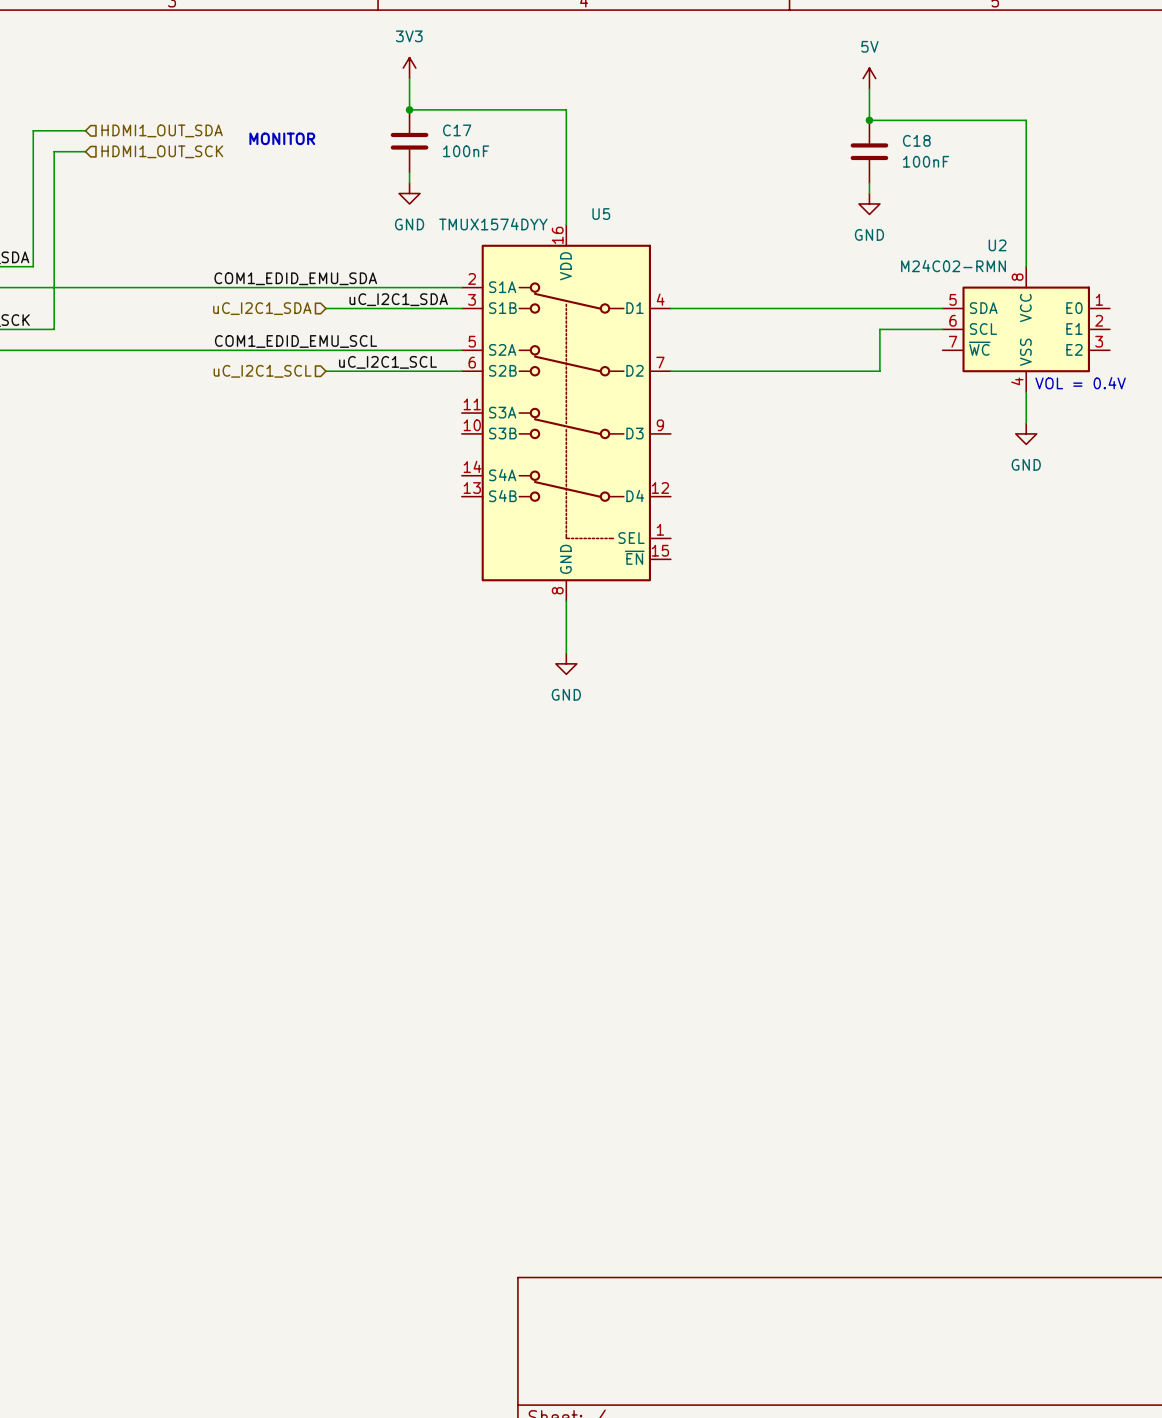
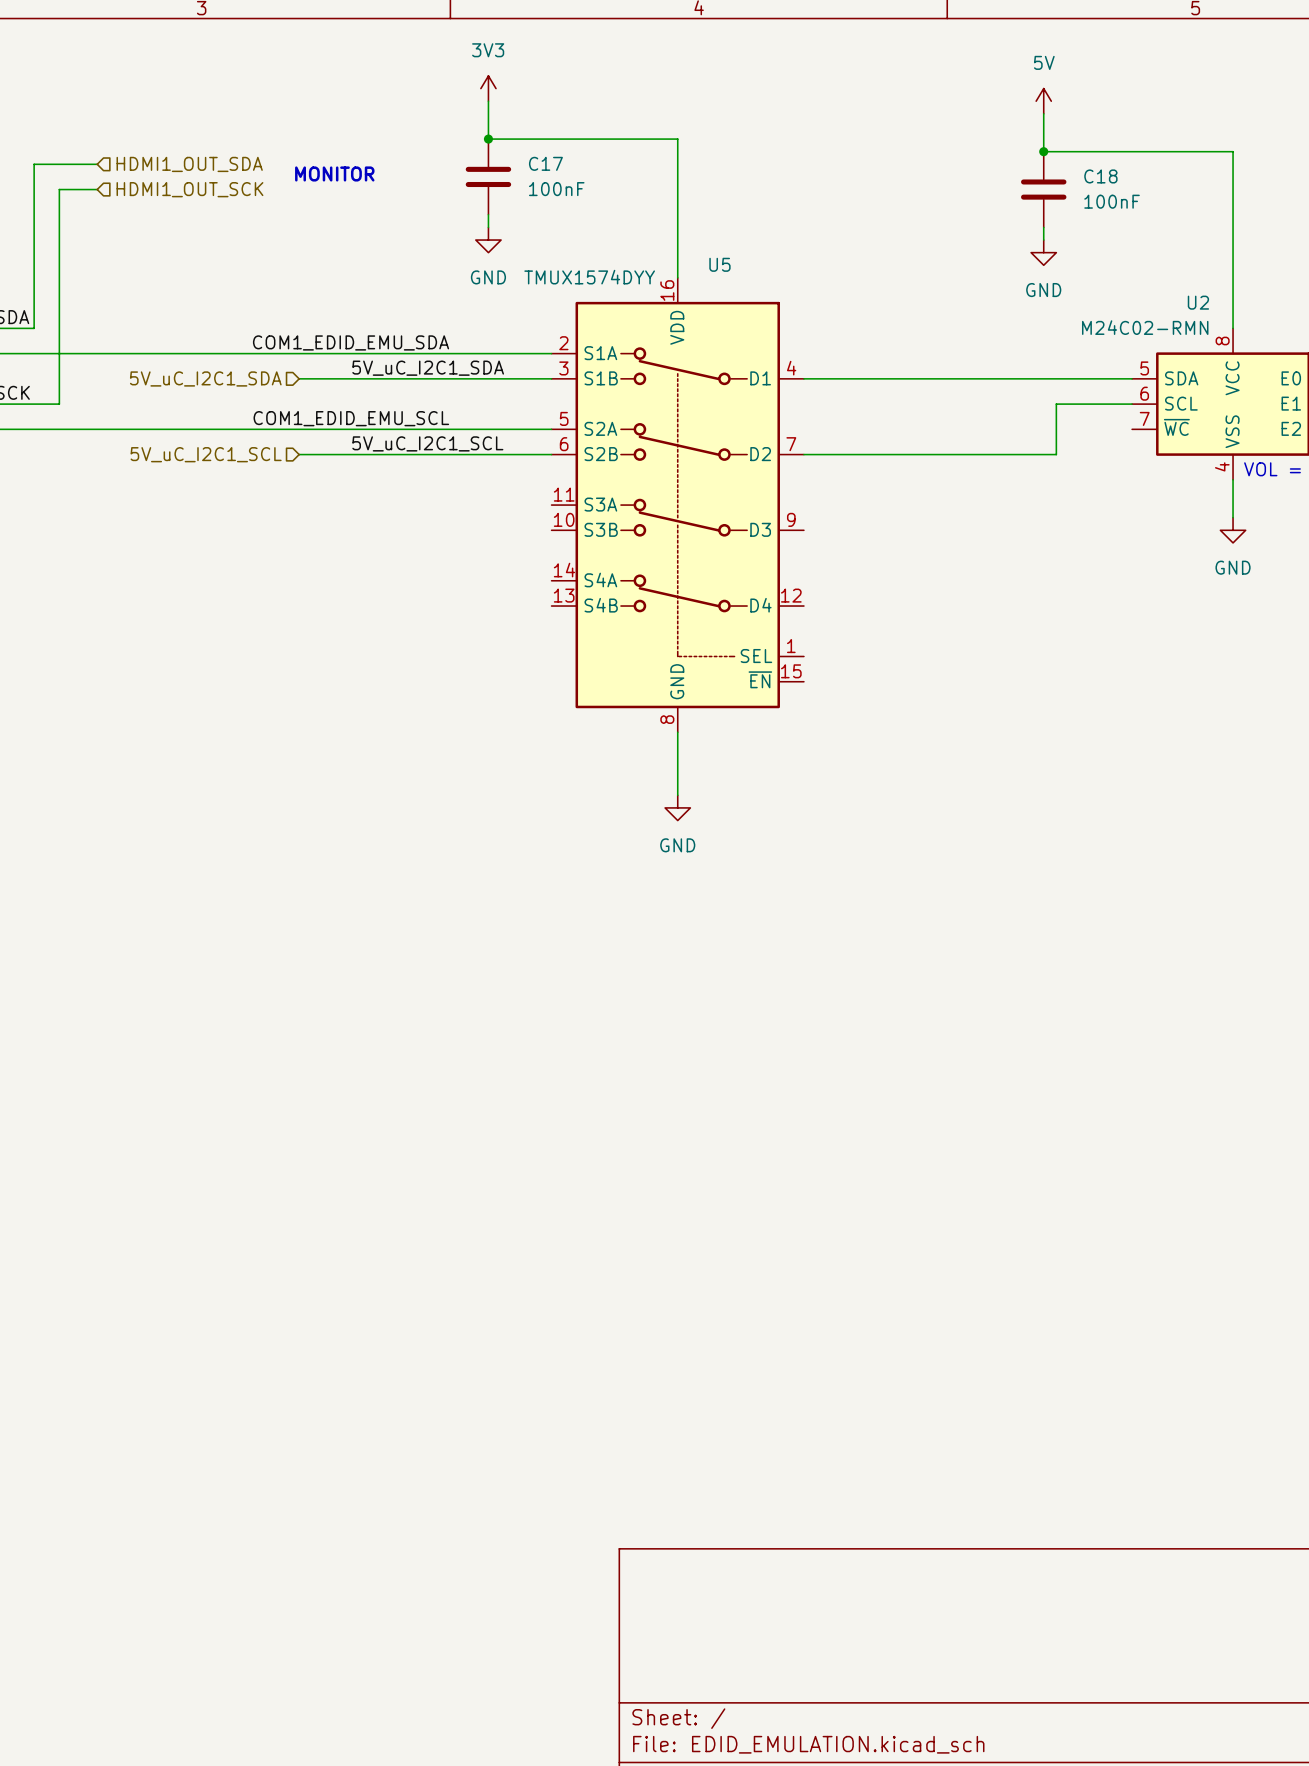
label: uC_I2C1_SDA (398, 299) -> 5V_uC_I2C1_SDA (428, 368)
wire: none -> (299, 378) (387, 378)
hierarchical label: uC_I2C1_SDA (262, 308) -> 5V_uC_I2C1_SDA (205, 378)
label: uC_I2C1_SCL (387, 362) -> 5V_uC_I2C1_SCL (427, 443)
wire: none -> (299, 454) (387, 454)
hierarchical label: uC_I2C1_SCL (262, 371) -> 5V_uC_I2C1_SCL (206, 454)

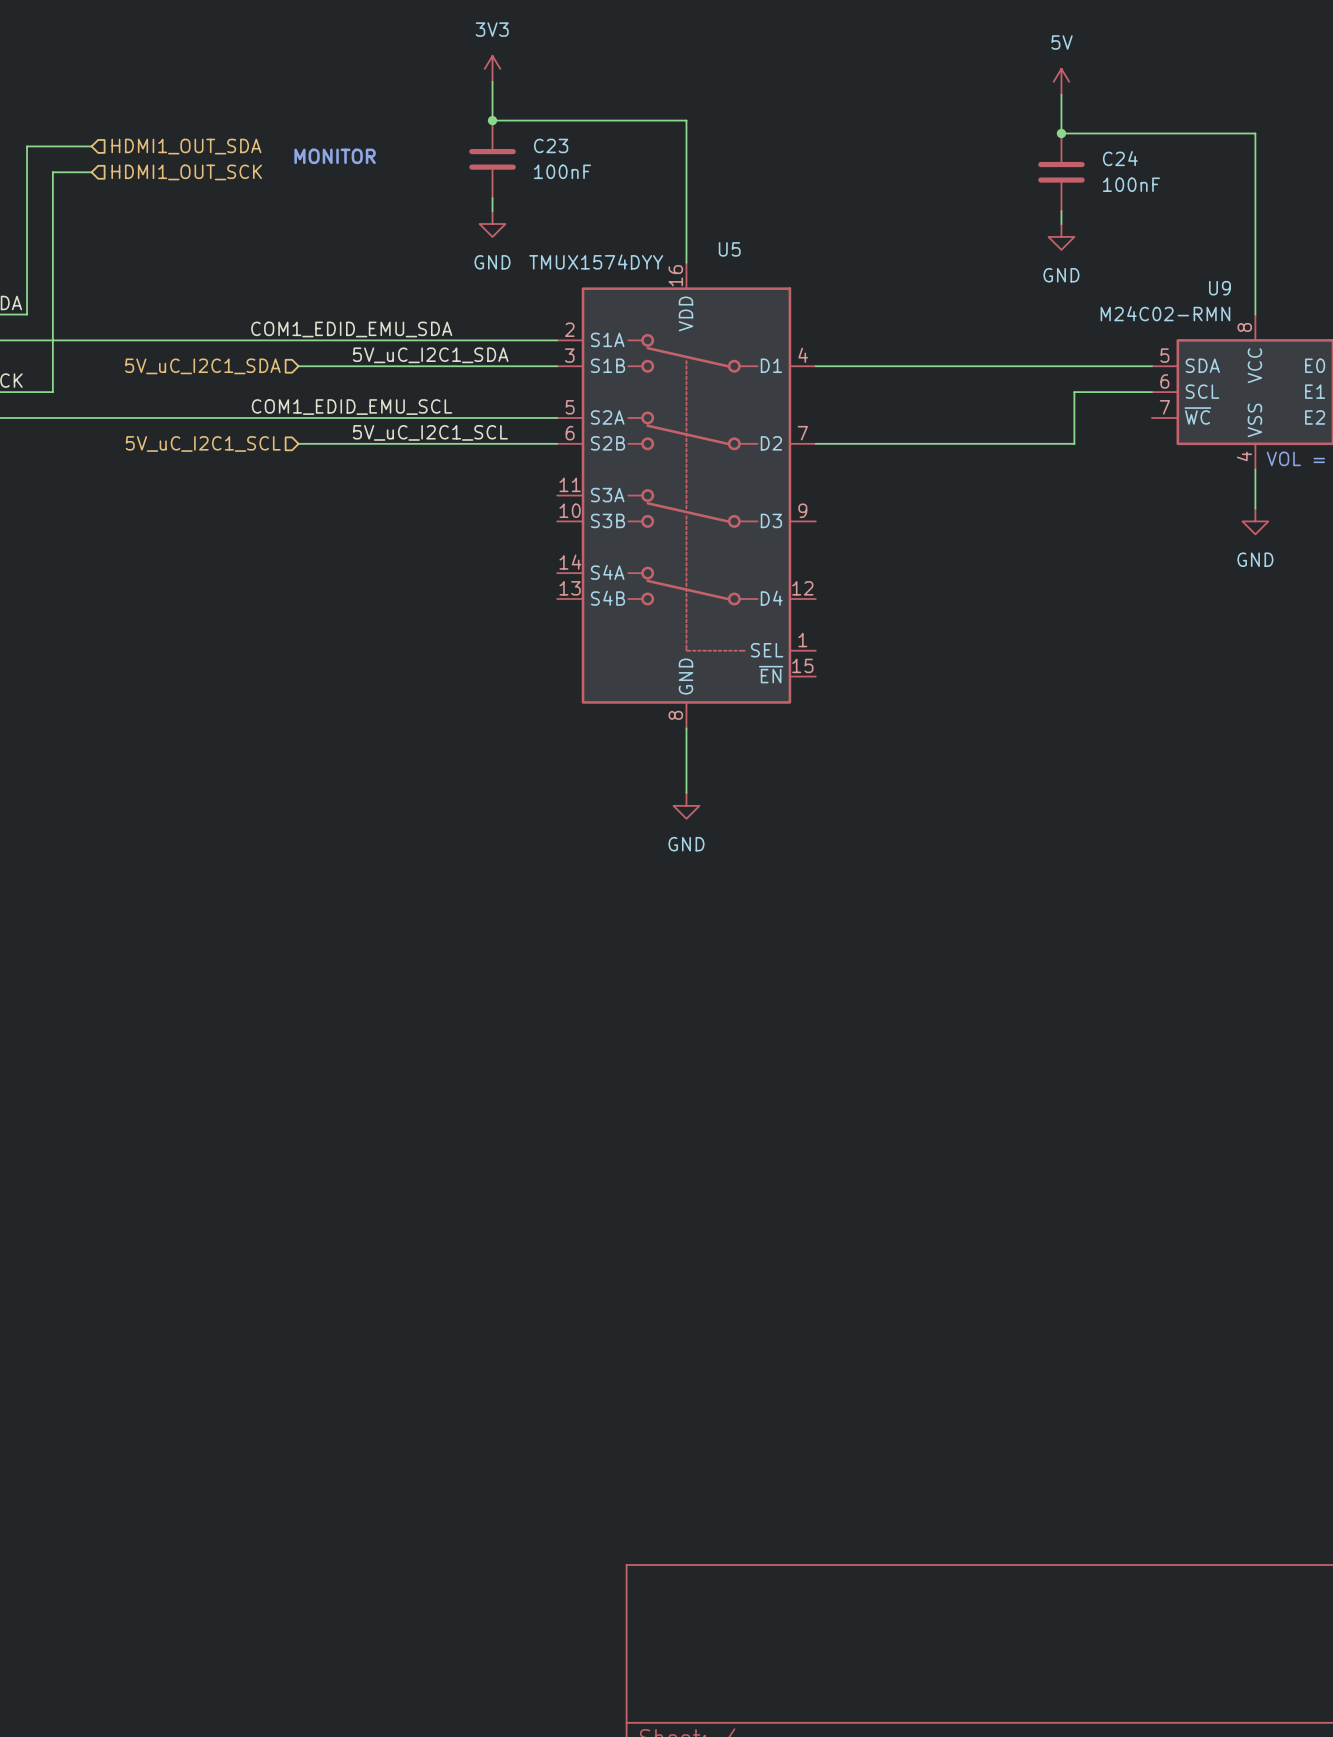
C17 name: C17 (545, 163) -> C23 (551, 145)
C18 name: C18 (1100, 176) -> C24 (1120, 158)
U2 name: U2 (1198, 302) -> U9 (1219, 288)

